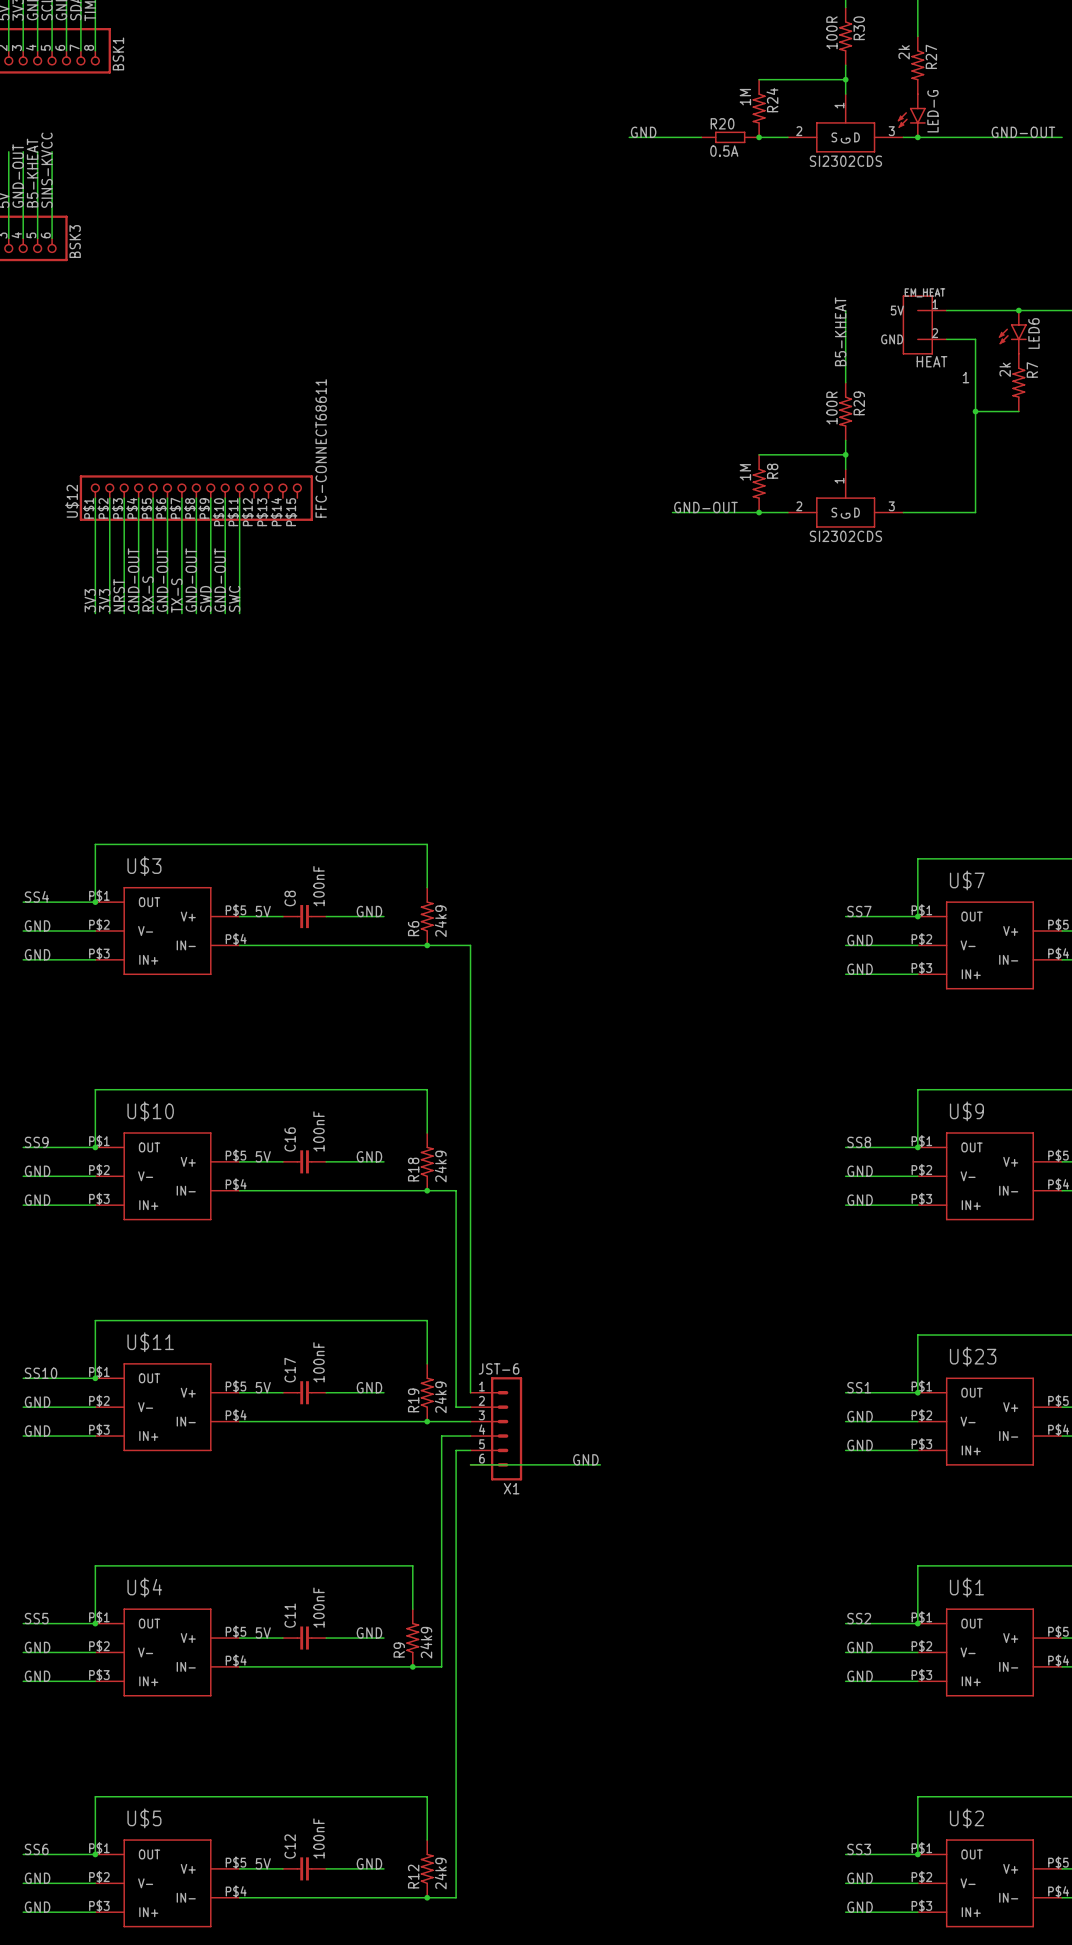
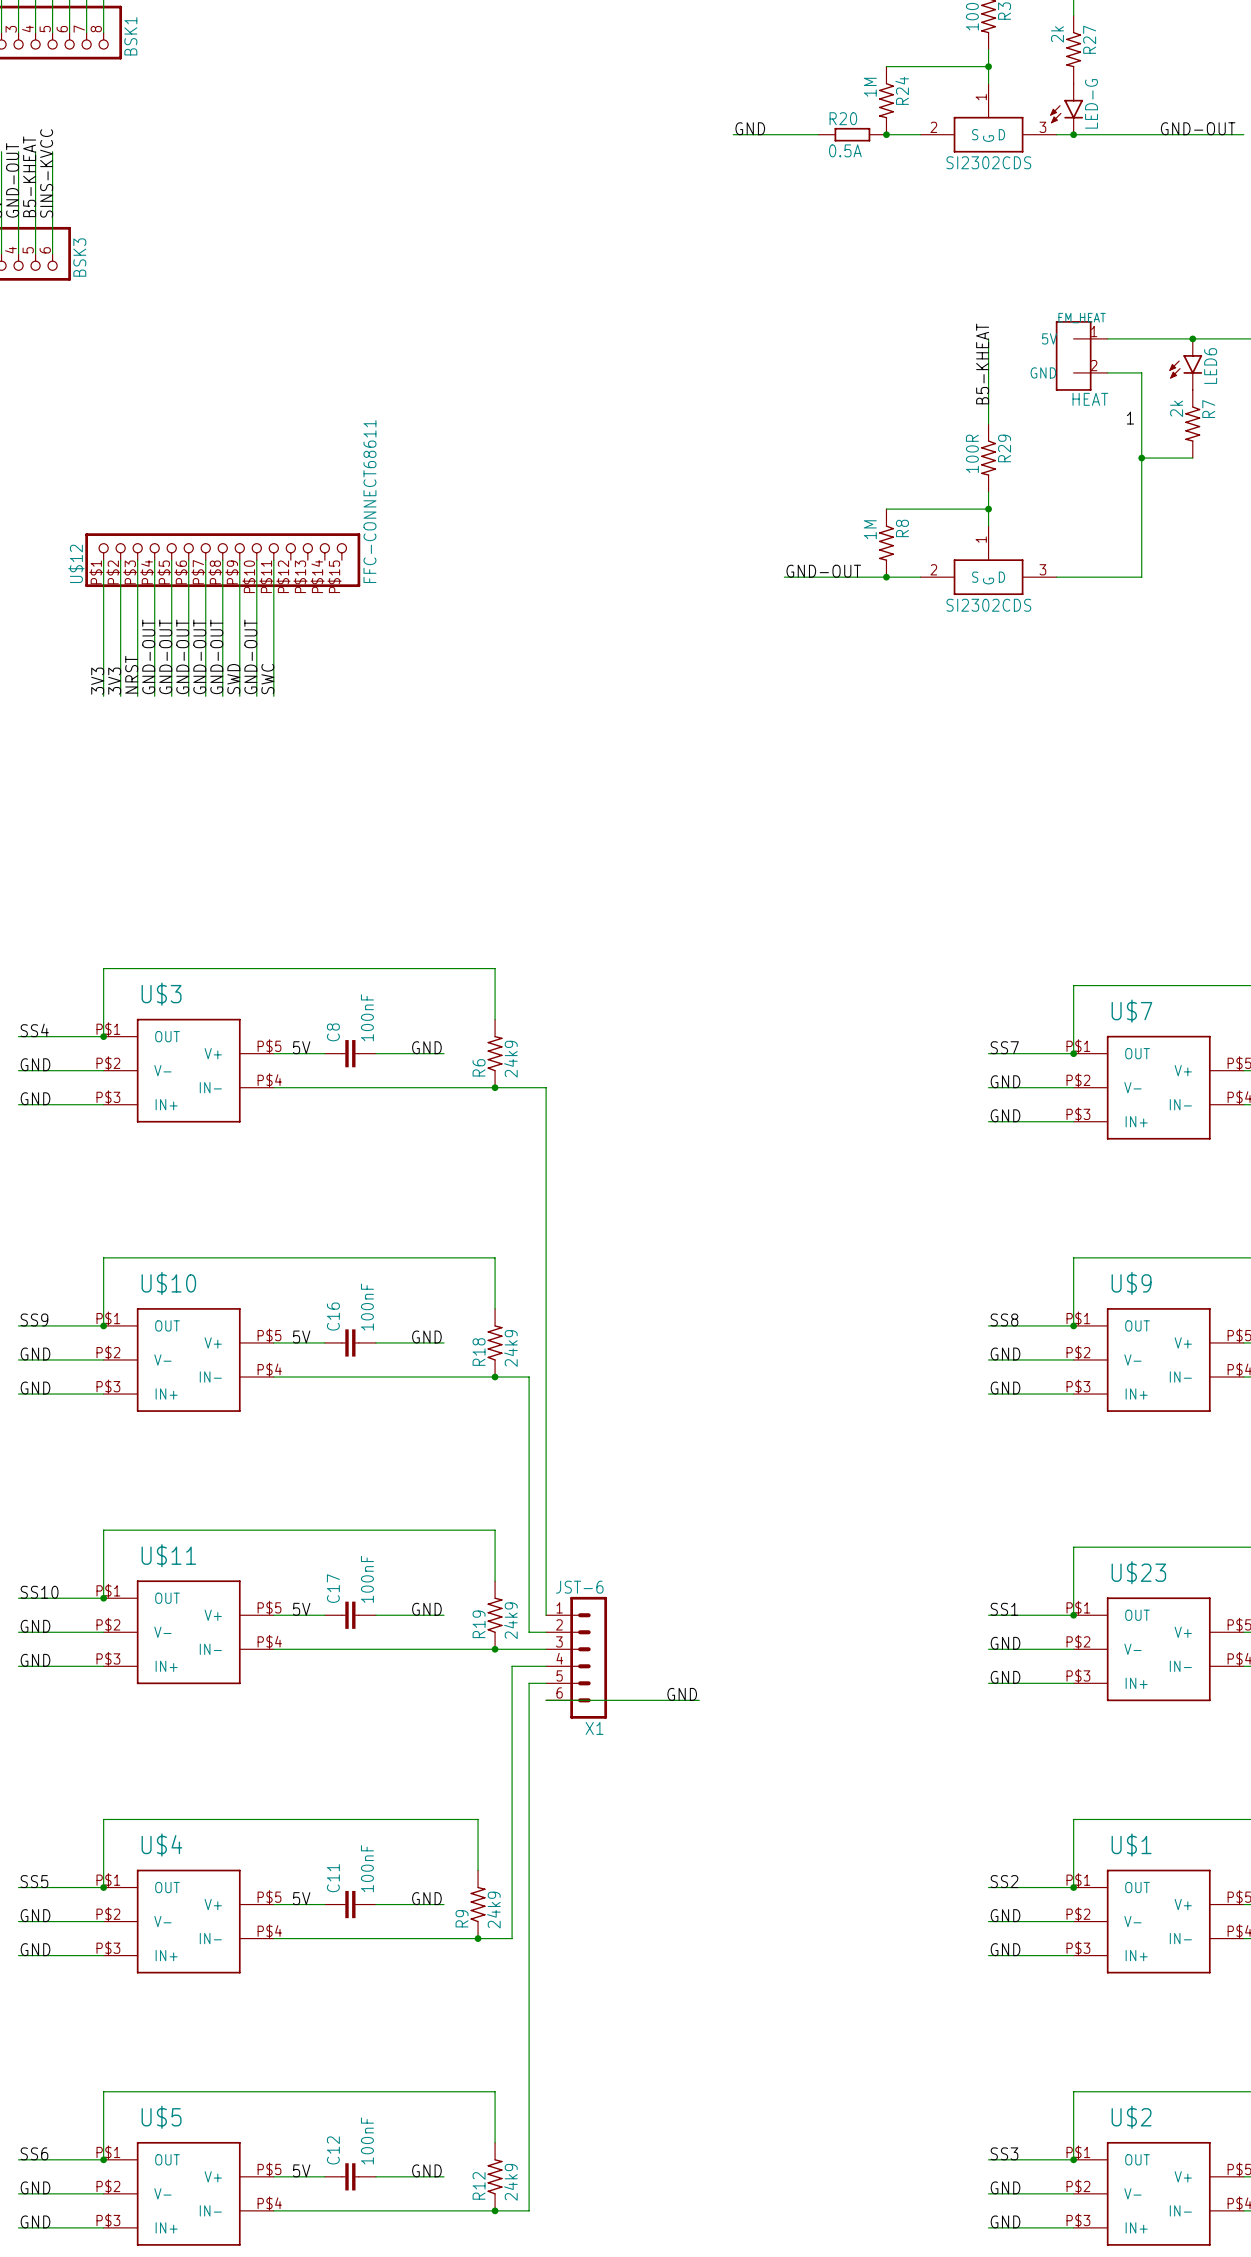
label: RX-S (148, 593) -> GND-OUT (165, 656)
label: TX-S (176, 595) -> GND-OUT (199, 656)

